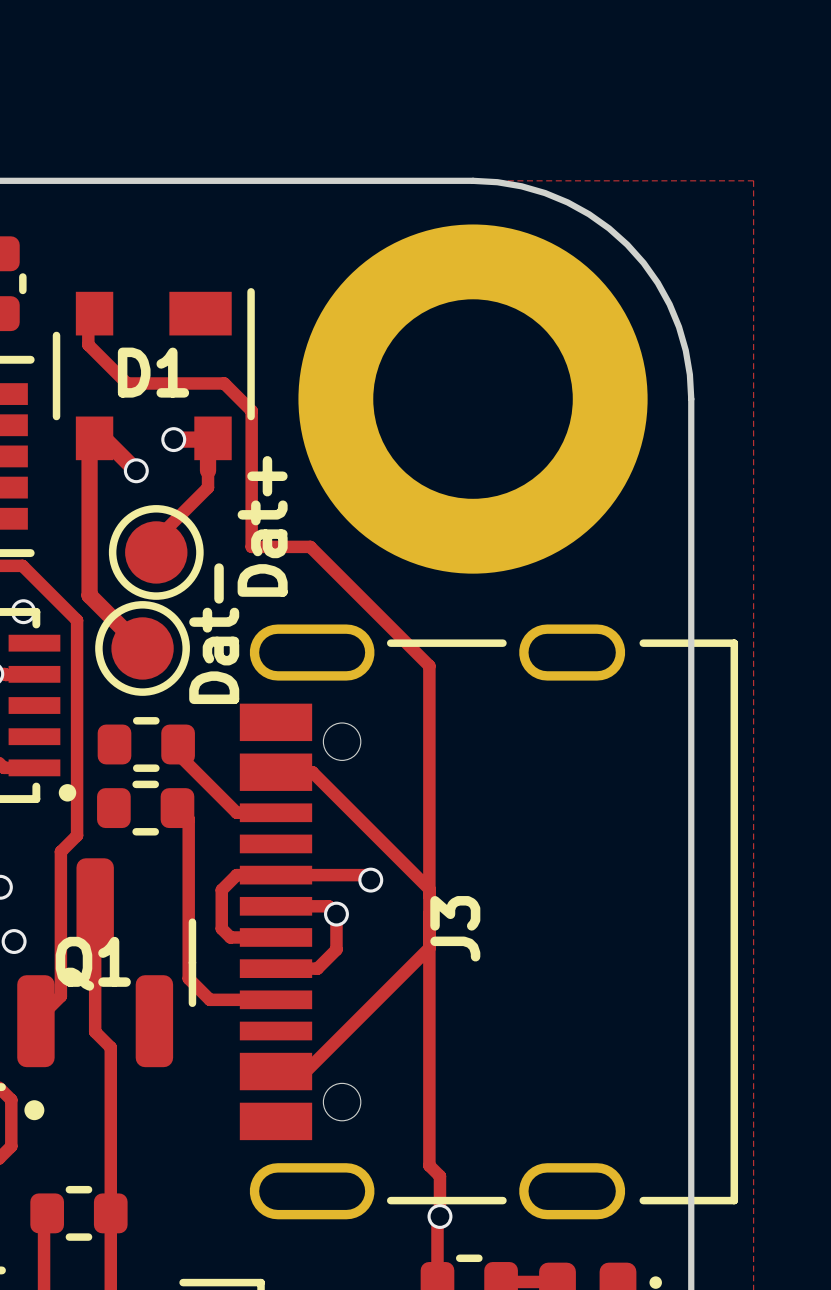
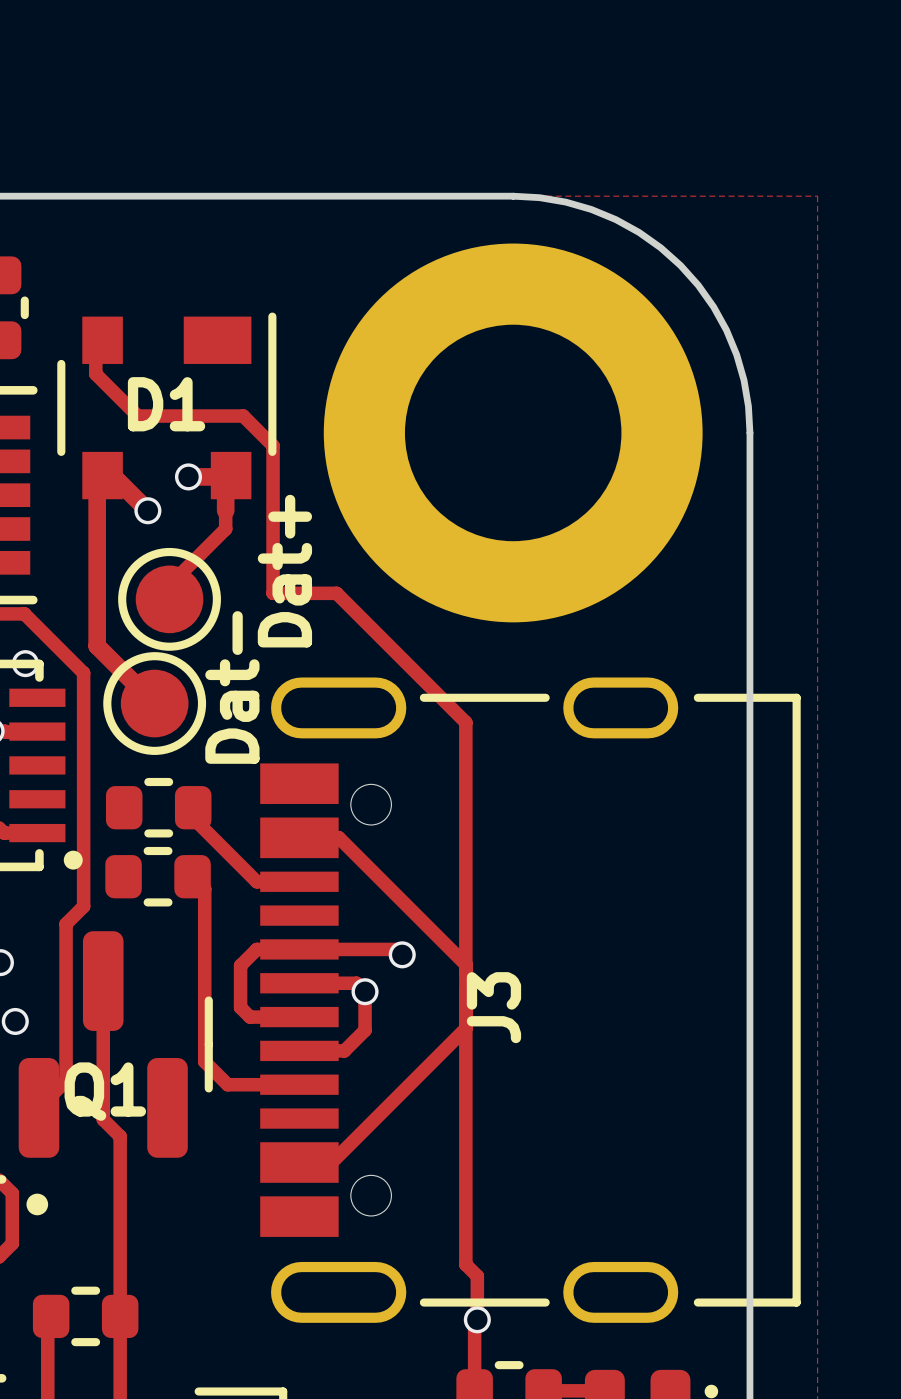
Q1 name position: Q1 (93, 963) -> Q1 (105, 1091)

